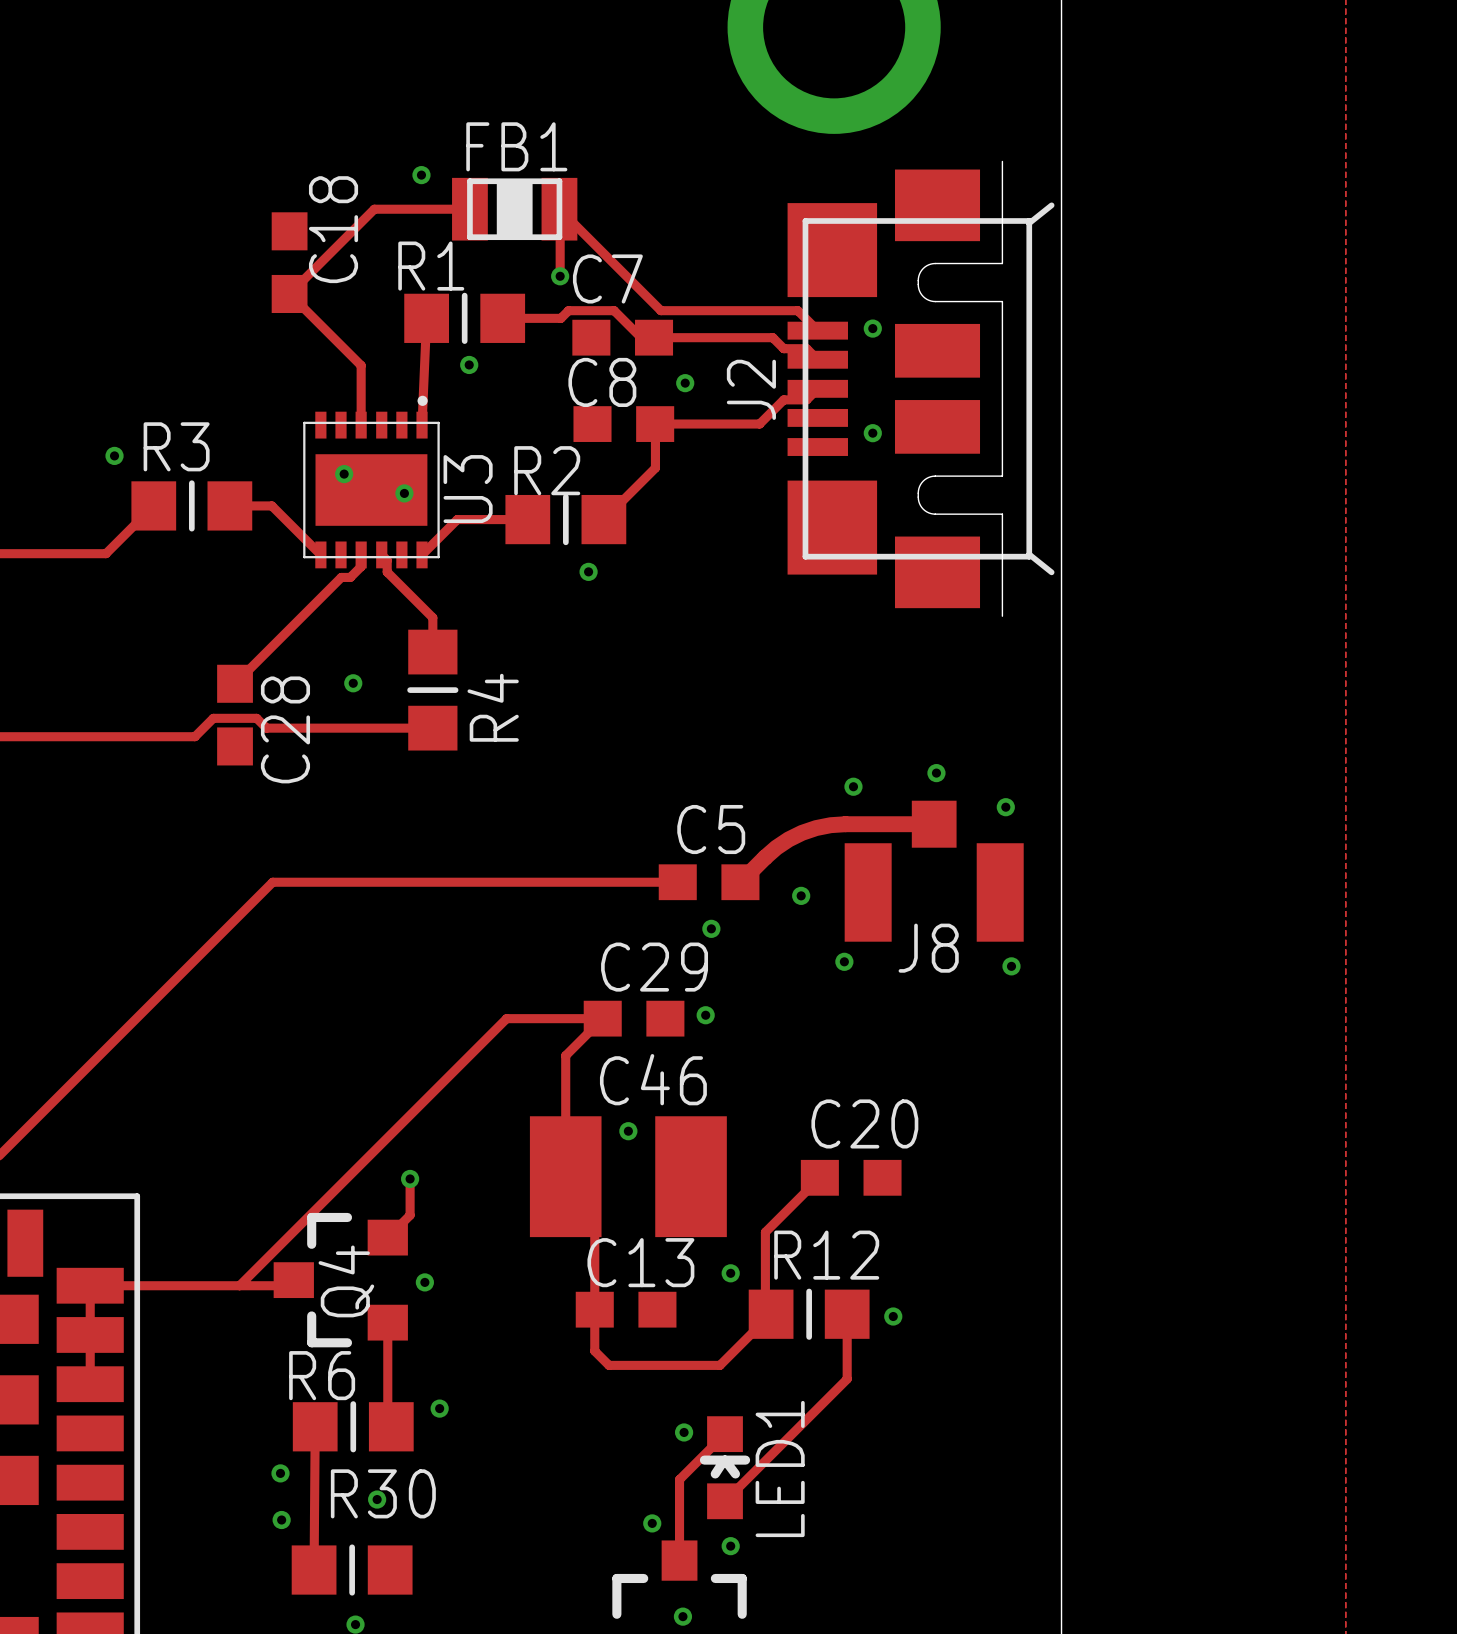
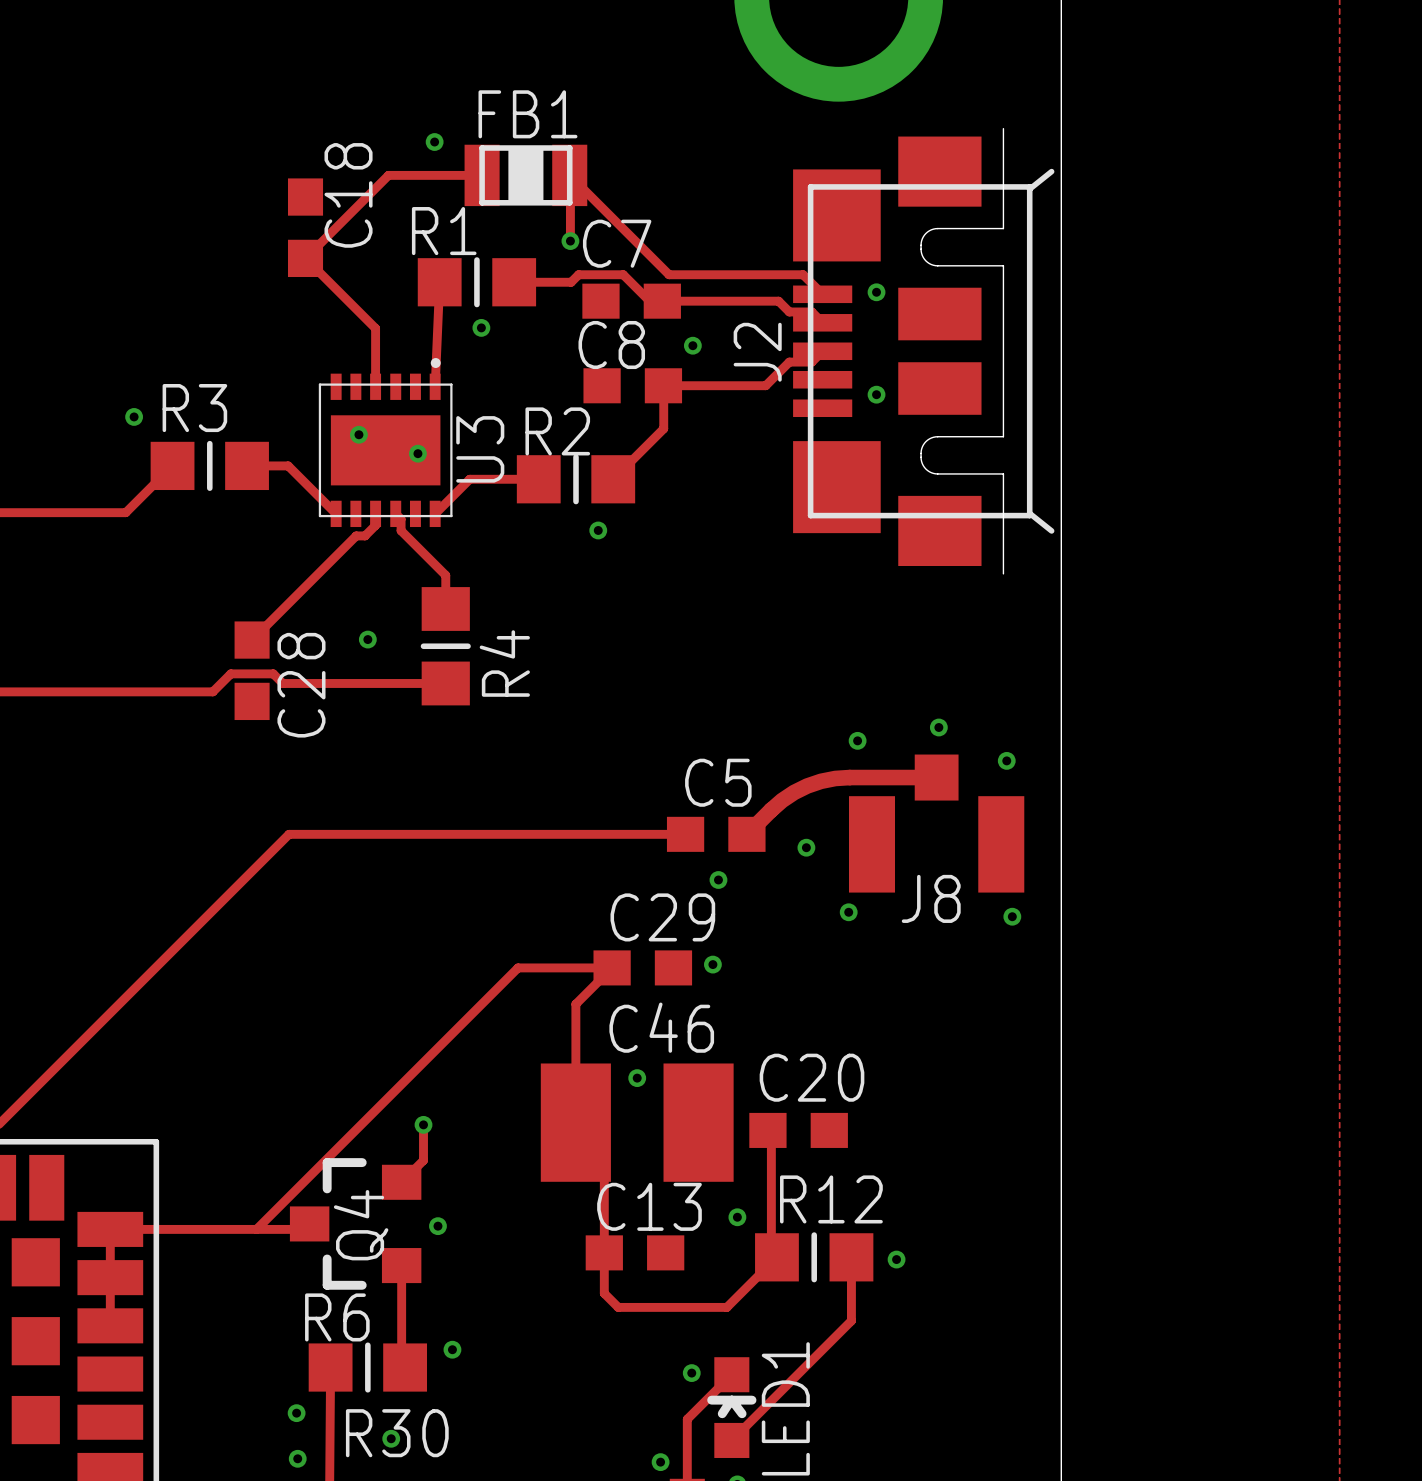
track: (819, 1177) (765, 1232) -> (767, 1130) (771, 1133) (771, 1177)
C20 position: (851, 1177) -> (798, 1130)

